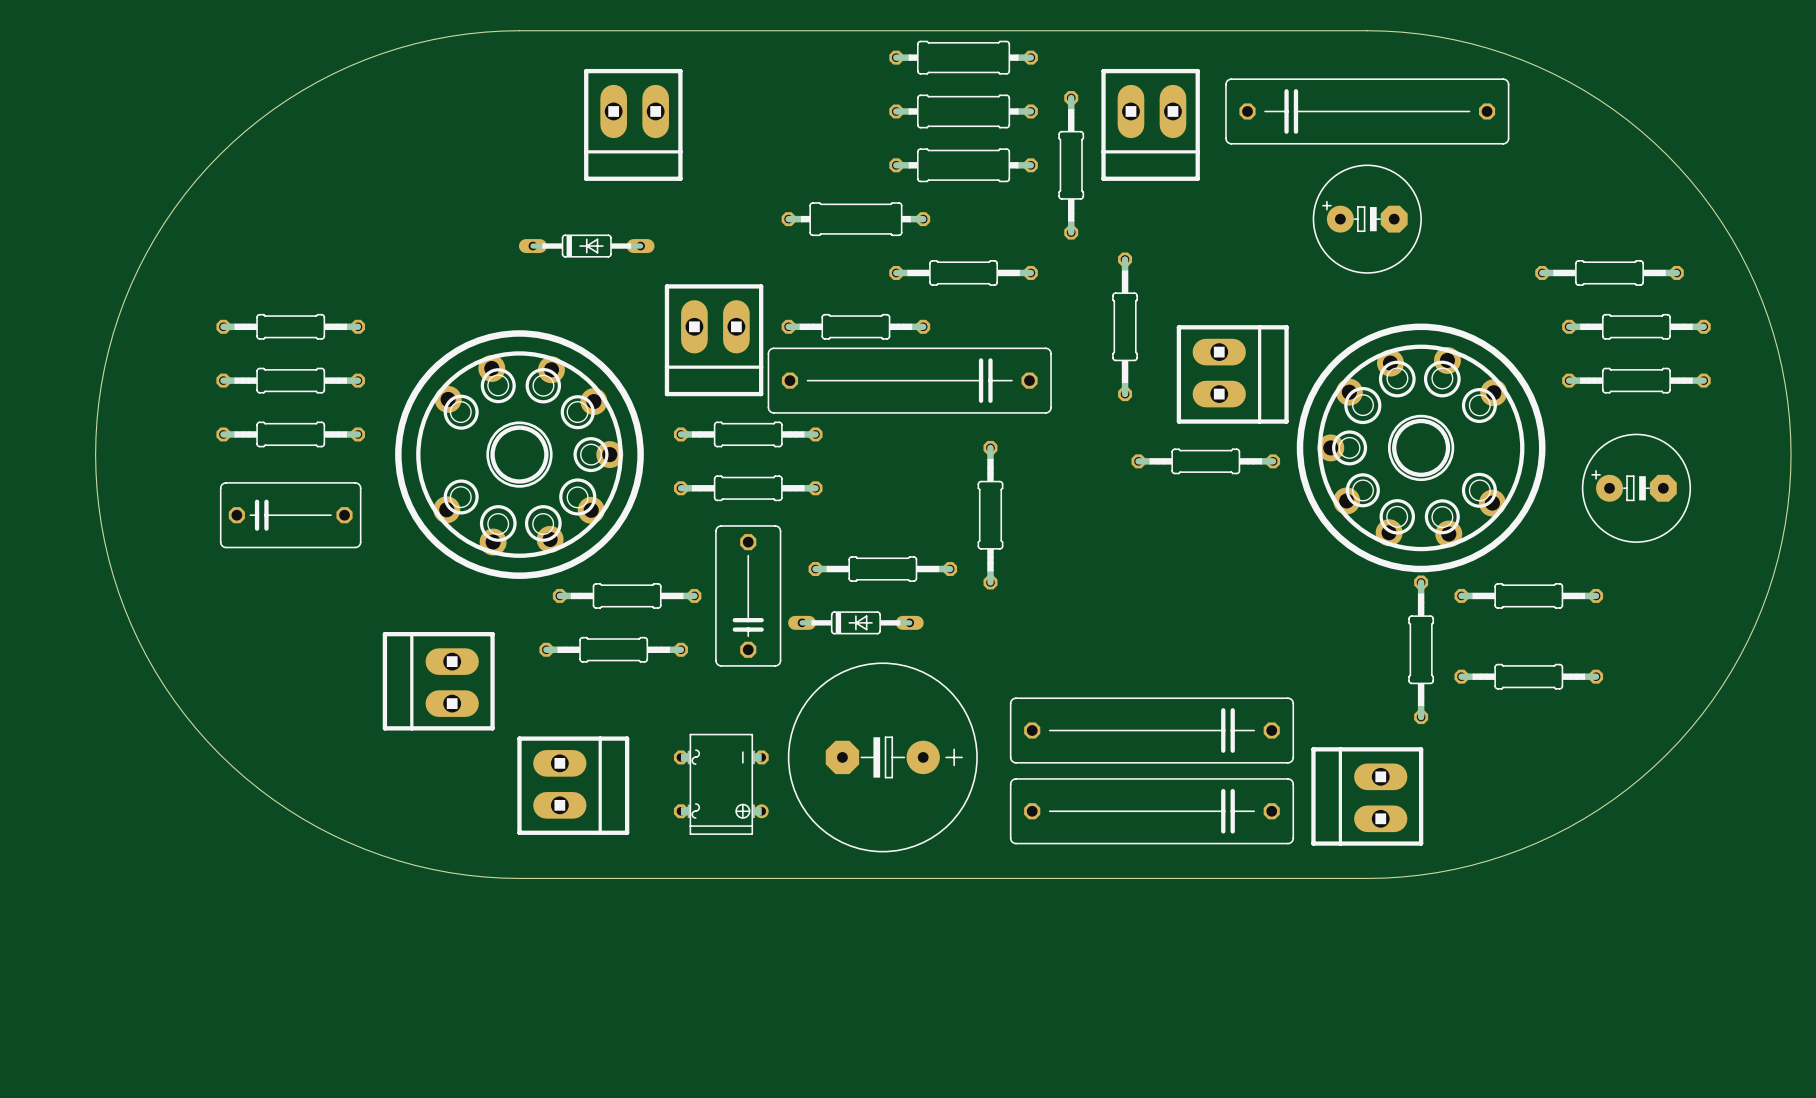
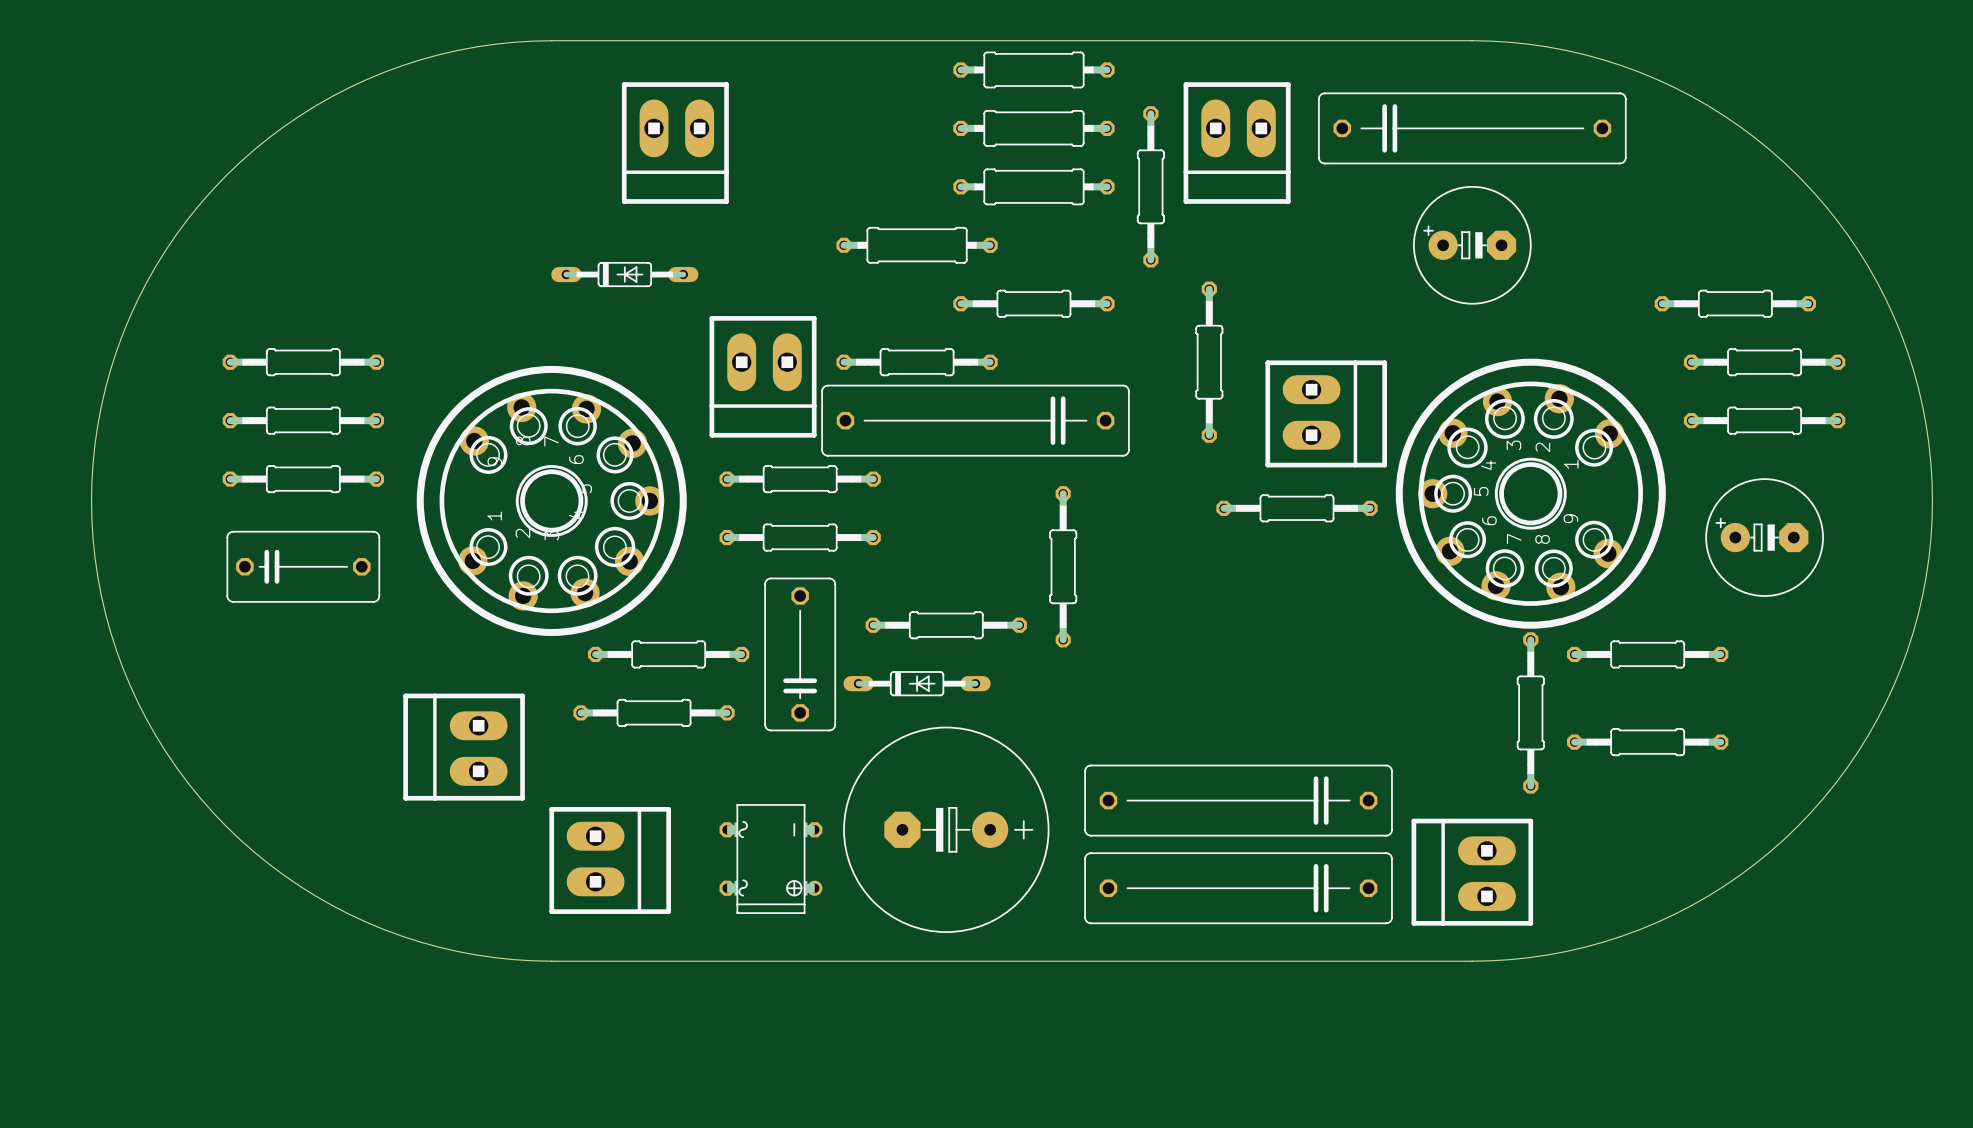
part footprint: [1296, 323, 1546, 573] -> [1395, 358, 1666, 629]
part footprint: [395, 330, 644, 579] -> [416, 365, 687, 636]

